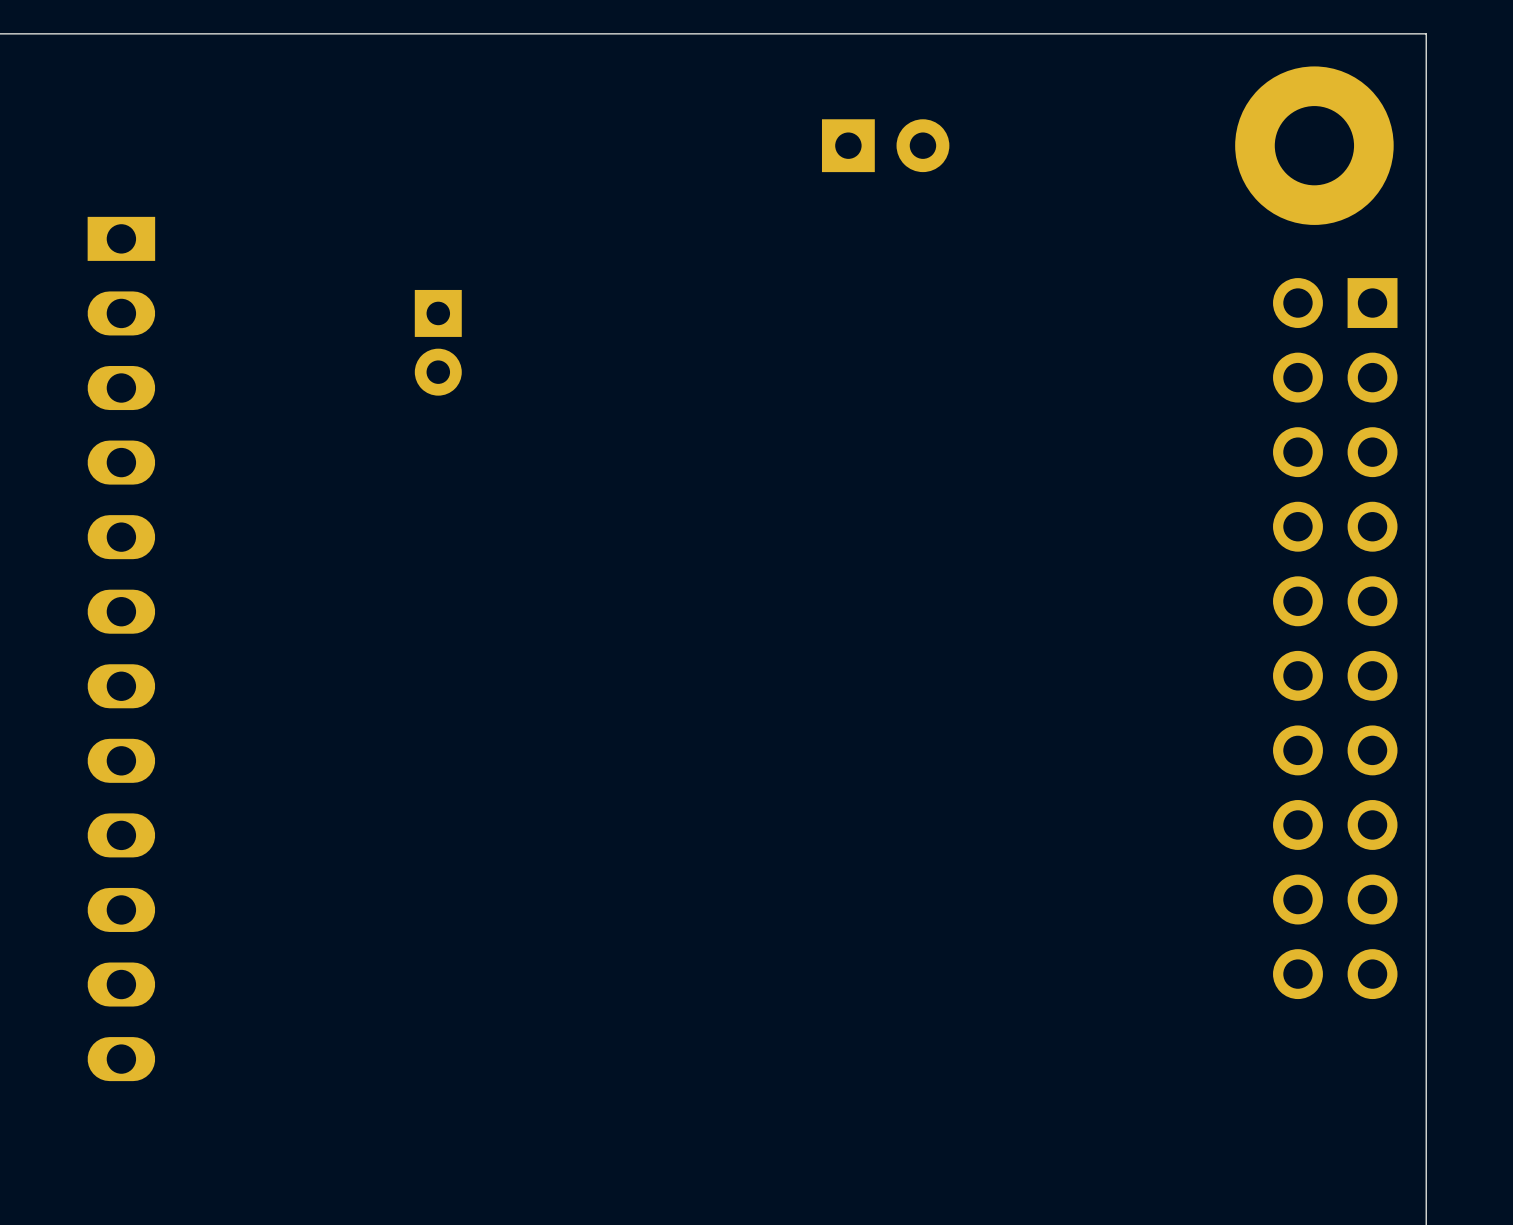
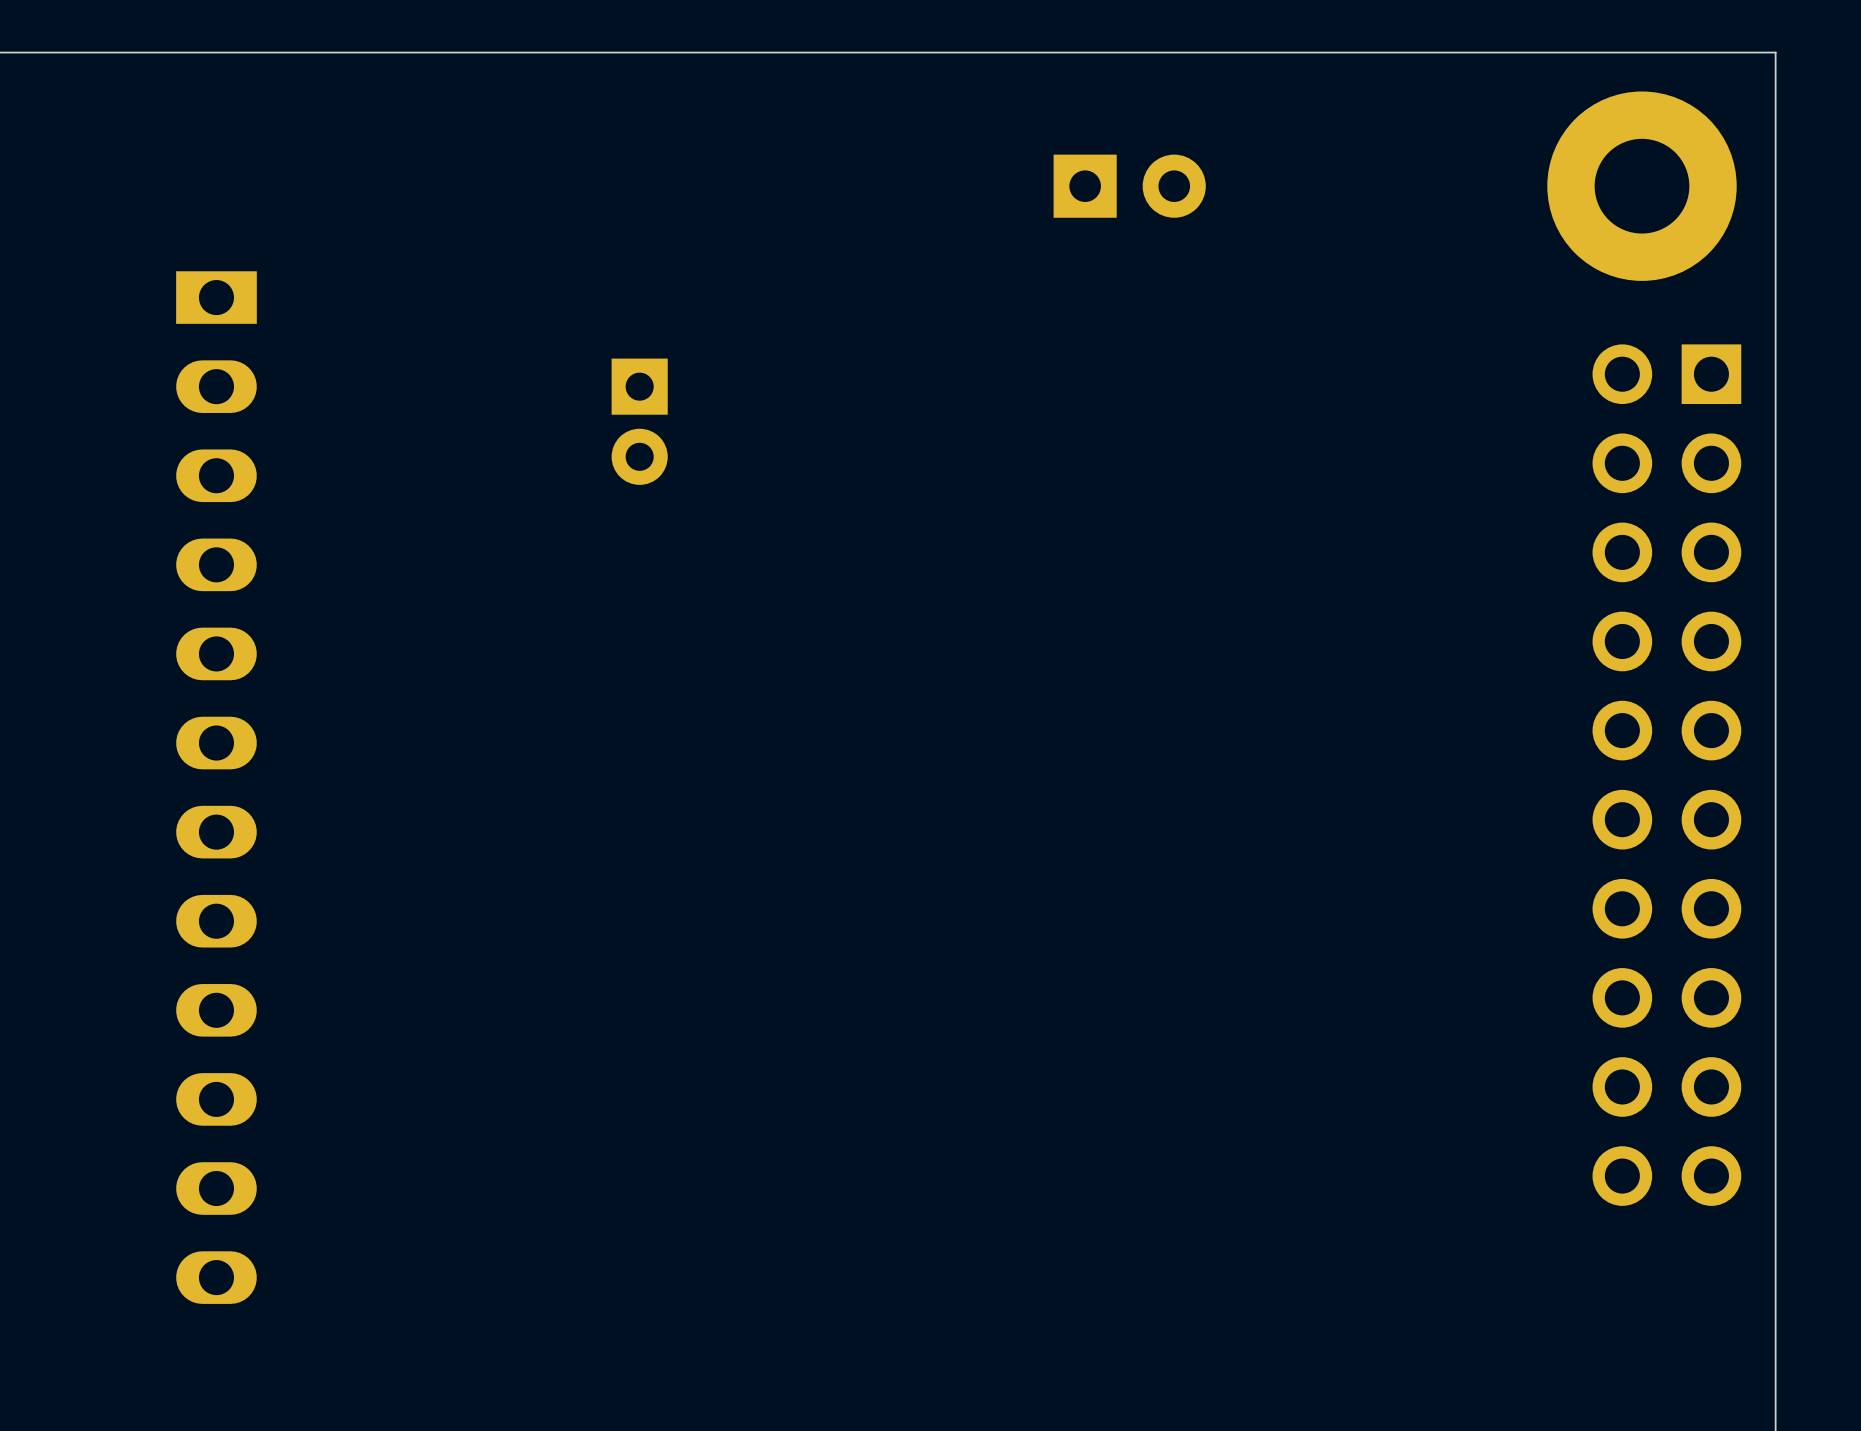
part position: (438, 342) -> (639, 421)

